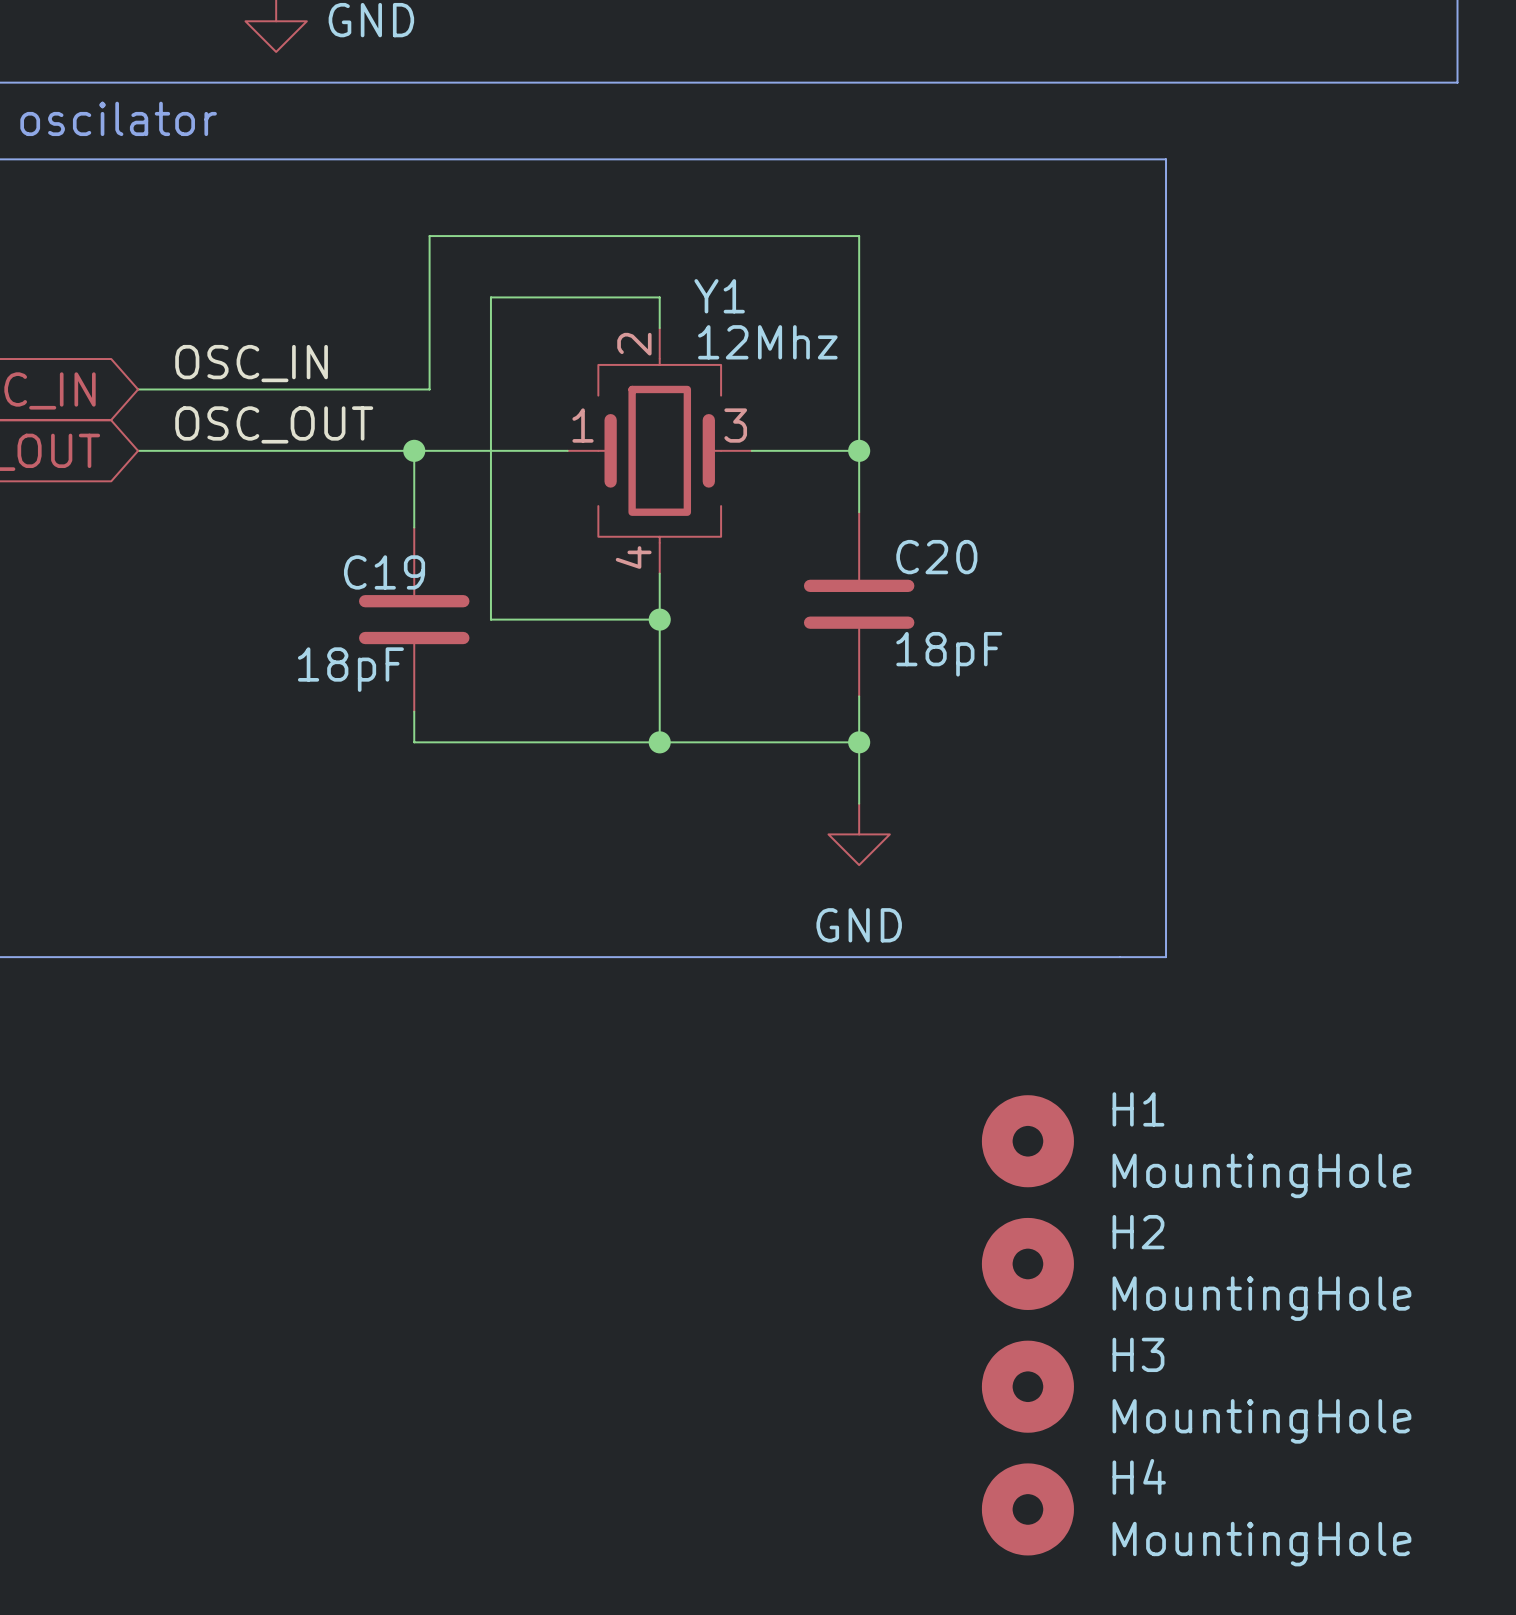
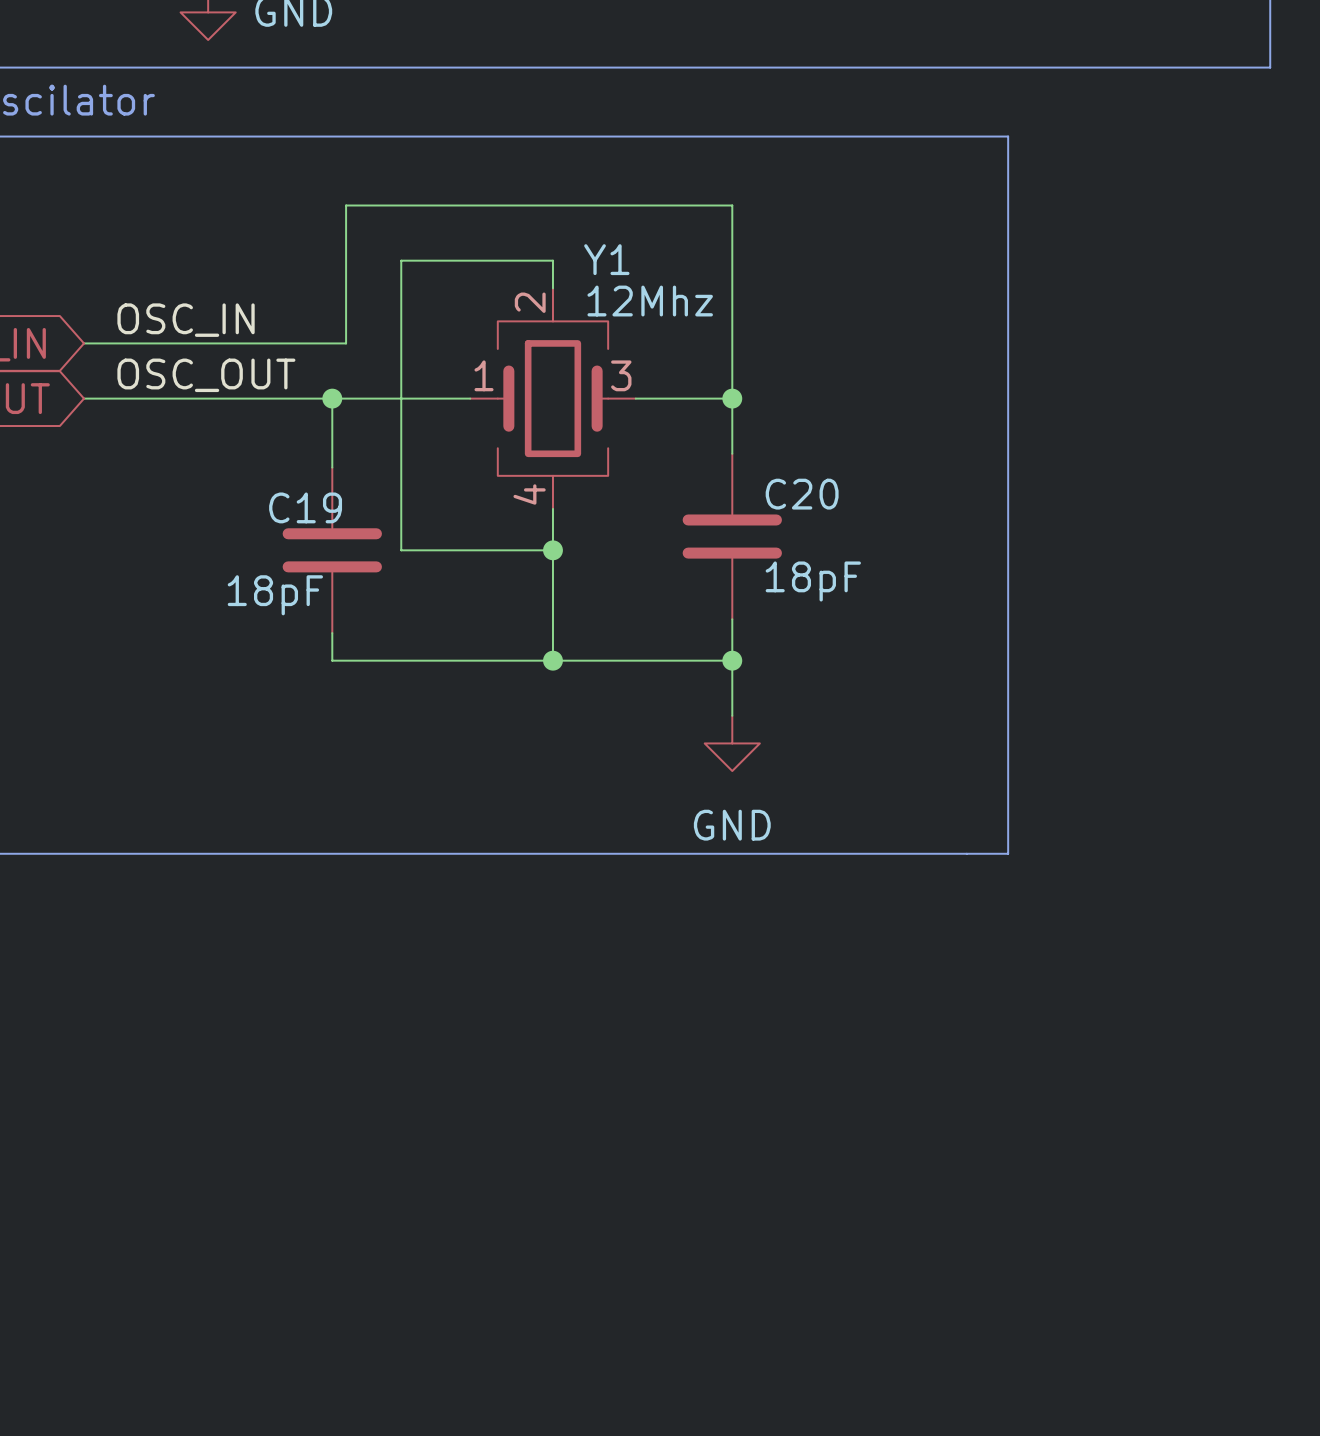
H1: MountingHole (1027, 1141) -> none
H2: MountingHole (1027, 1263) -> none
H3: MountingHole (1027, 1386) -> none
H4: MountingHole (1027, 1509) -> none

